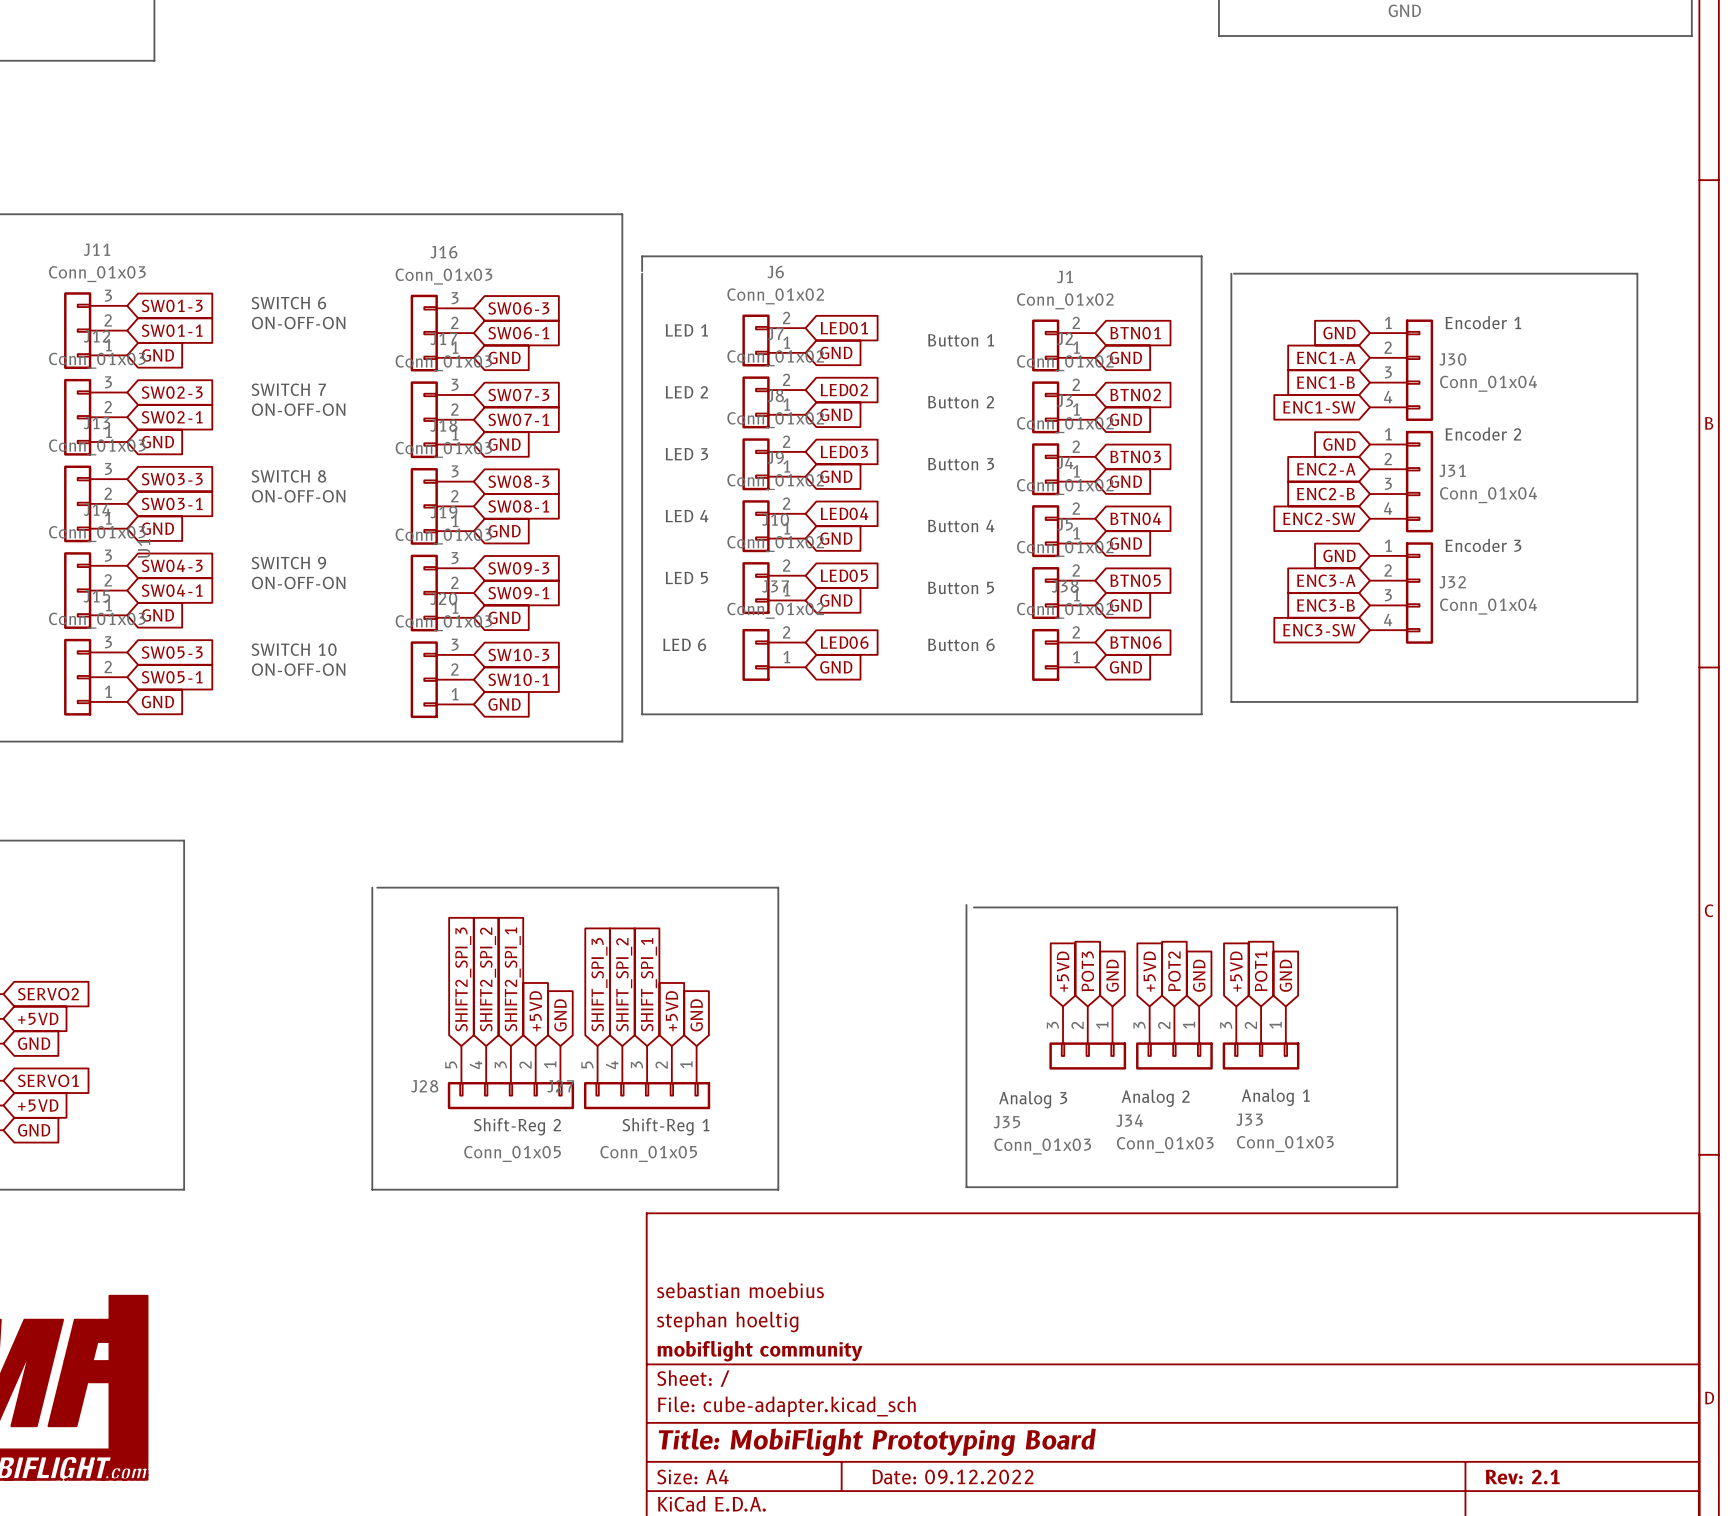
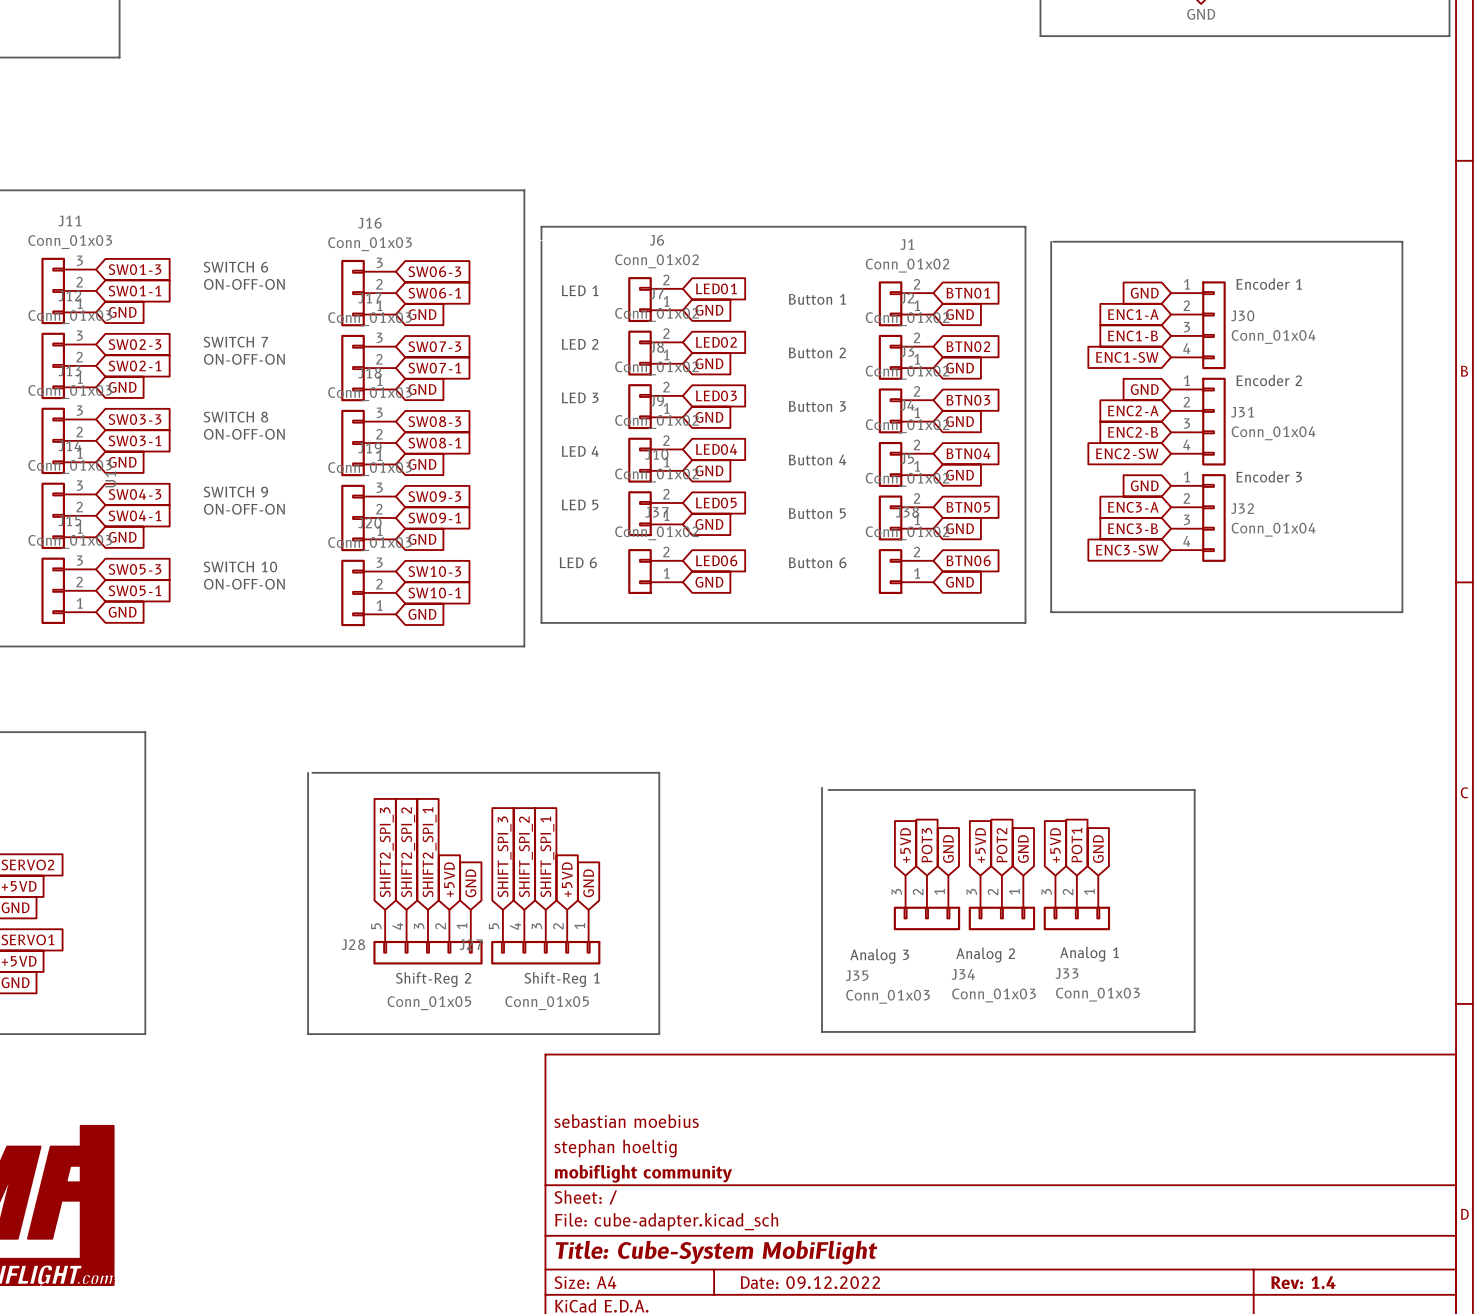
title block: Title: MobiFlight Prototyping Board (877, 1442) -> Title: Cube-System MobiFlight (716, 1252)
title block: Rev: 2.1 (1522, 1477) -> Rev: 1.4 (1303, 1282)

